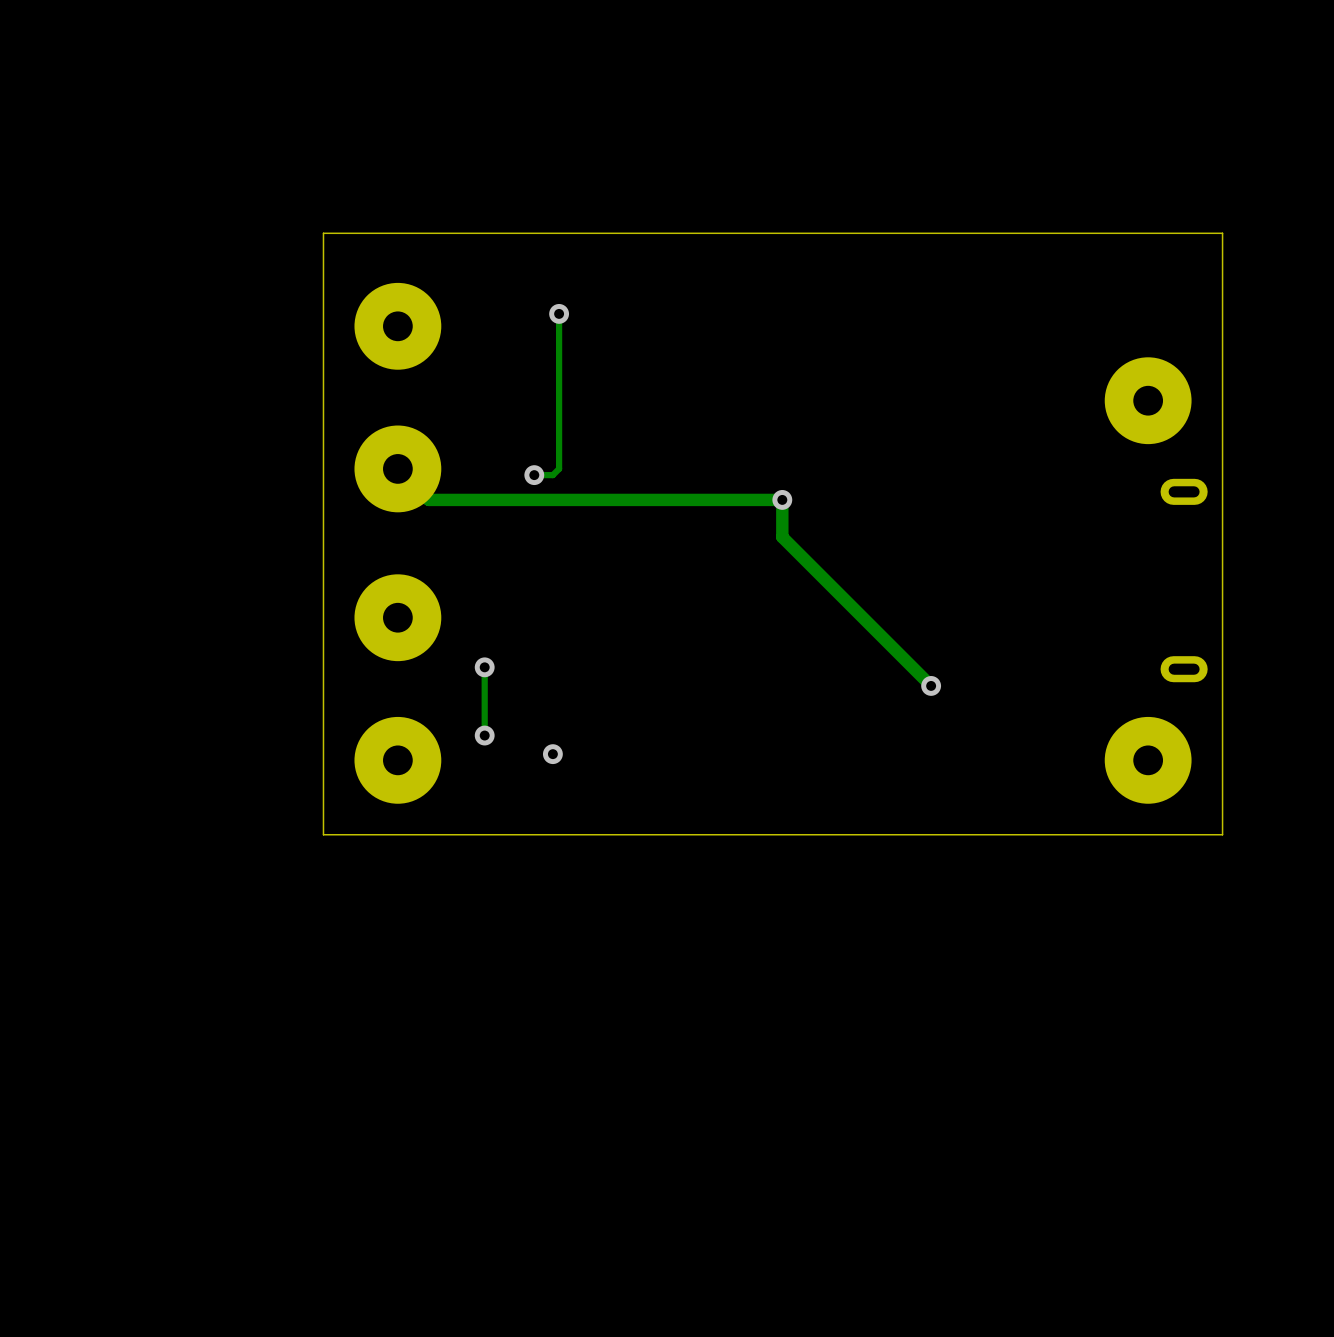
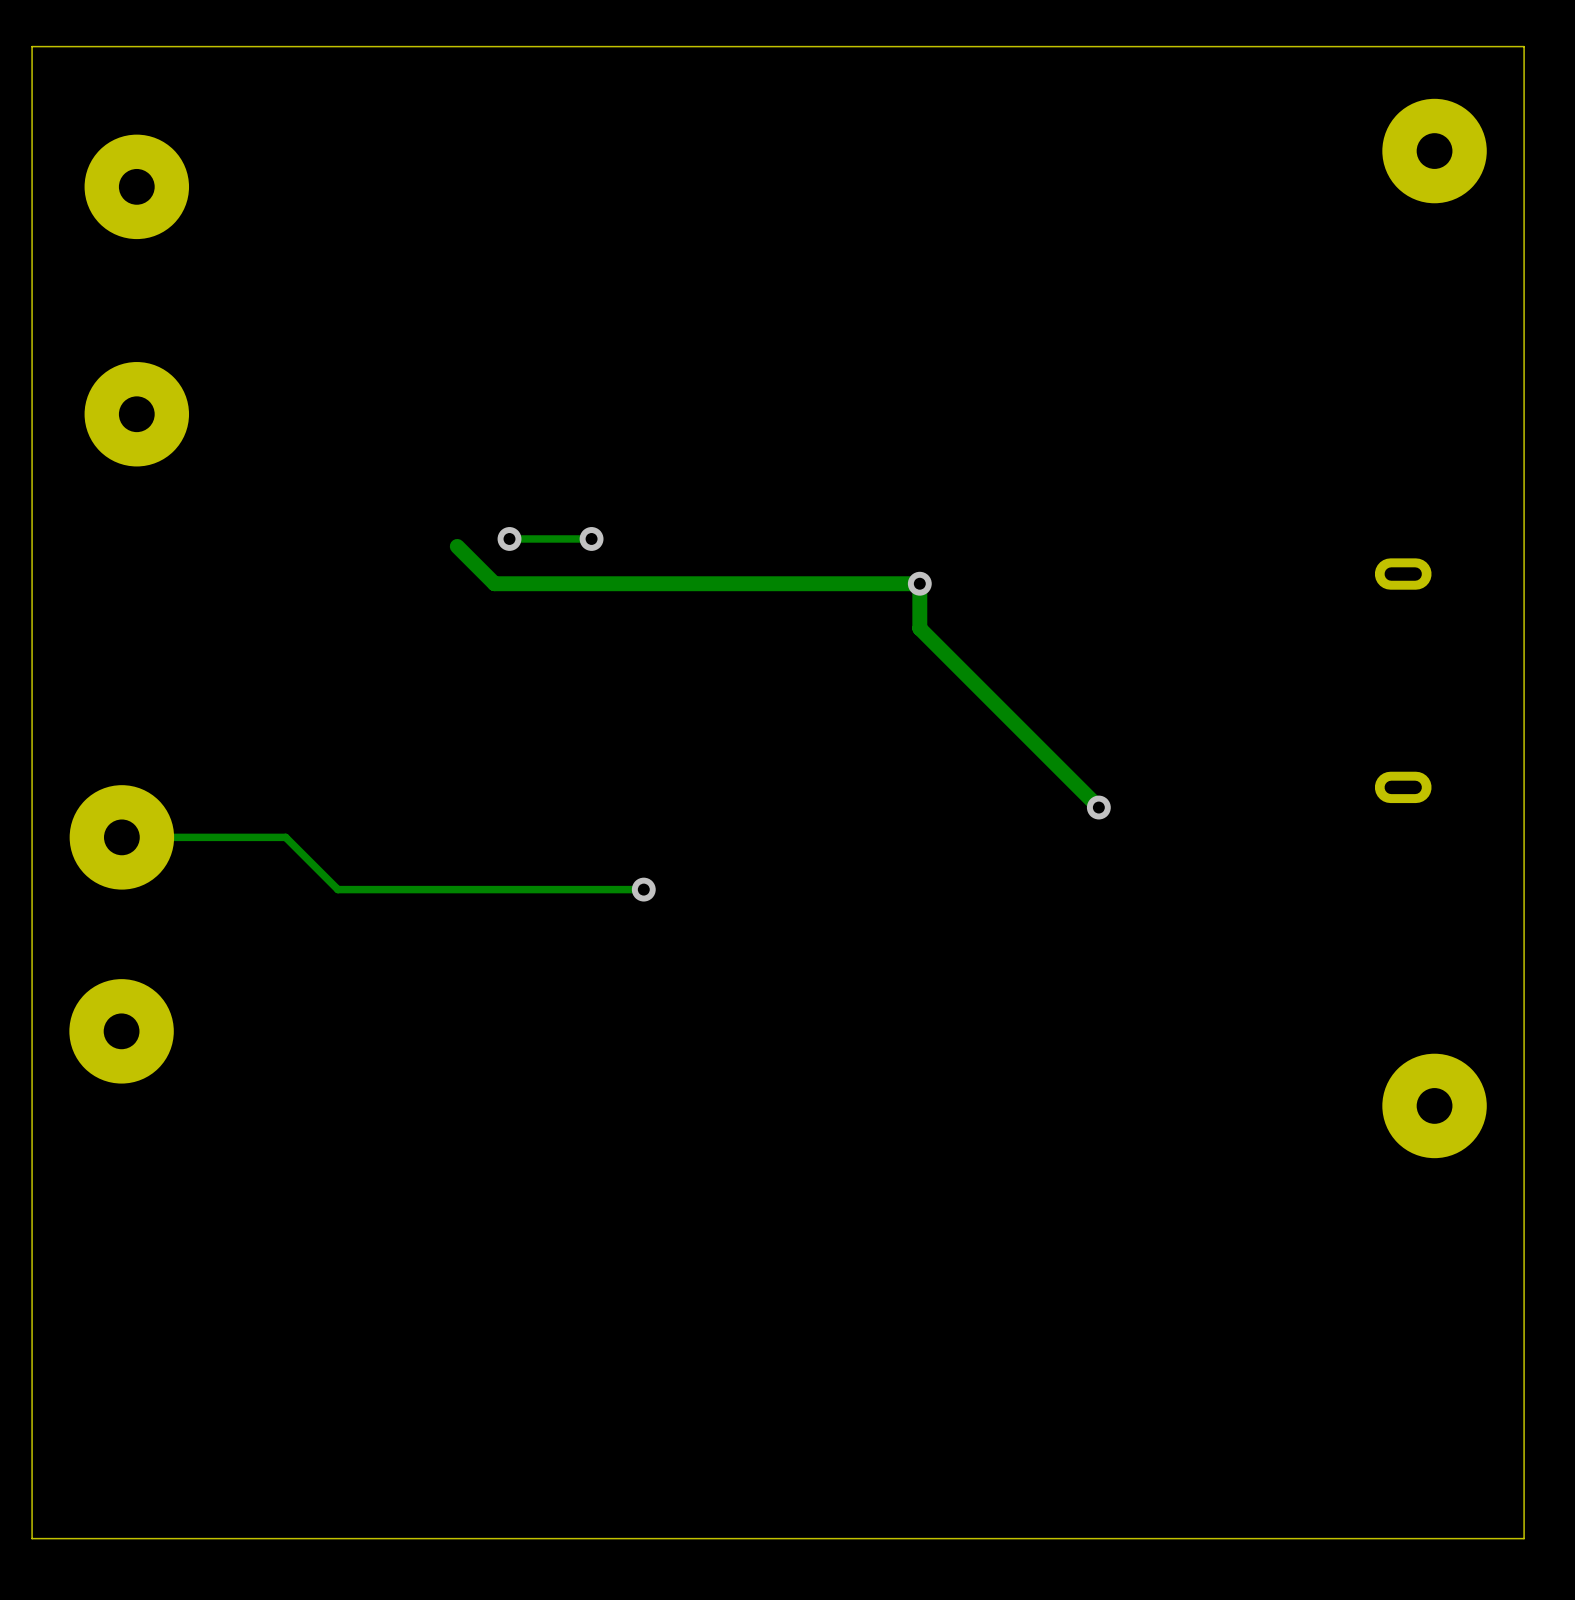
board edge: none -> (1524, 46) (32, 46) (32, 1538) (1524, 1538) (1524, 46)
part: none -> (136, 186)
board edge: (1222, 233) (1222, 834) (323, 834) (323, 233) (1222, 233) -> none
track: (559, 313) (559, 468) (552, 475) (534, 475) -> none
via: (559, 313) -> none
part: (397, 326) -> none
part: none -> (136, 414)
part position: (1148, 400) -> (1434, 151)
via: none -> (509, 538)
track: none -> (591, 538) (509, 538)
part: (397, 468) -> none
via position: (534, 475) -> (591, 538)
part: (397, 617) -> none
track: (484, 667) (484, 735) -> none
via: (484, 667) -> none
track: none -> (121, 837) (285, 837) (337, 889) (643, 889)
part: none -> (121, 837)
via: (484, 735) -> none
part: (397, 760) -> none
part position: (1148, 760) -> (1434, 1105)
part: none -> (121, 1031)

